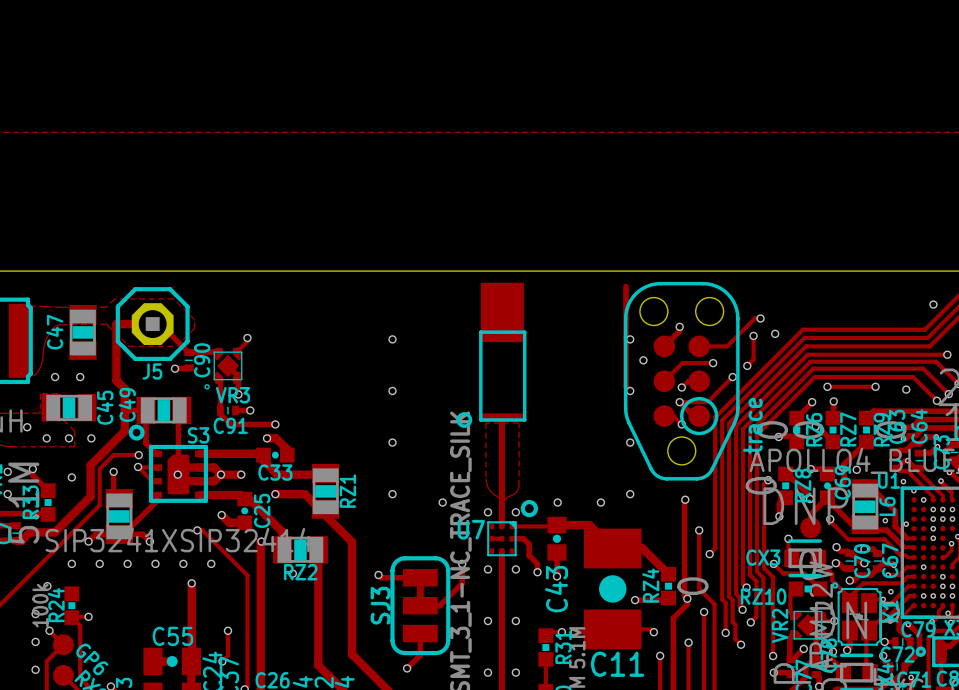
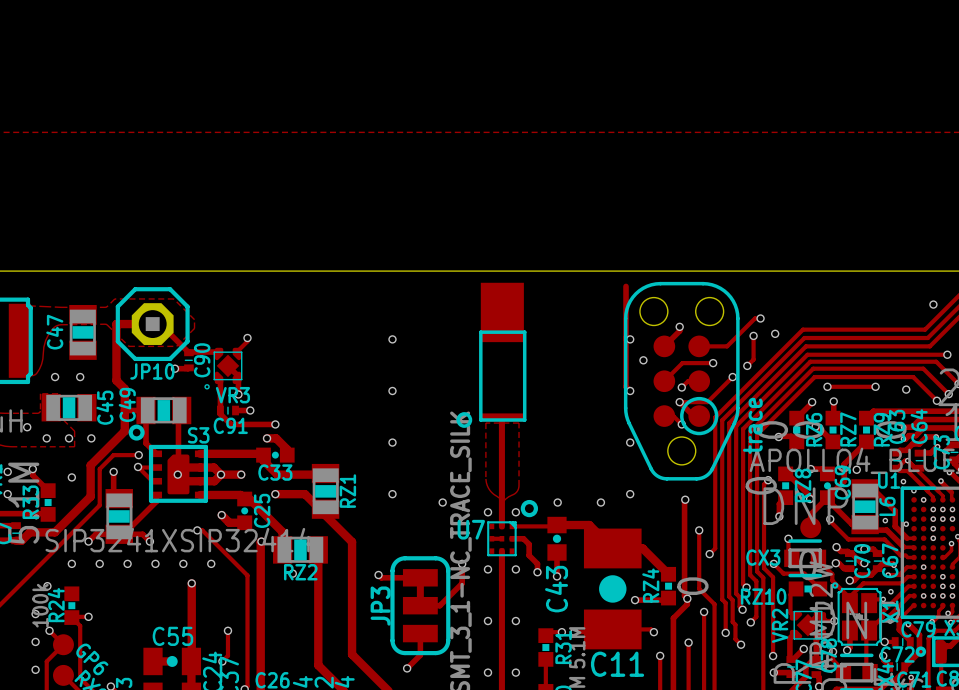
J5 name: J5 (152, 371) -> JP10 (152, 371)
SJ3 name: SJ3 (380, 605) -> JP3 (380, 606)

